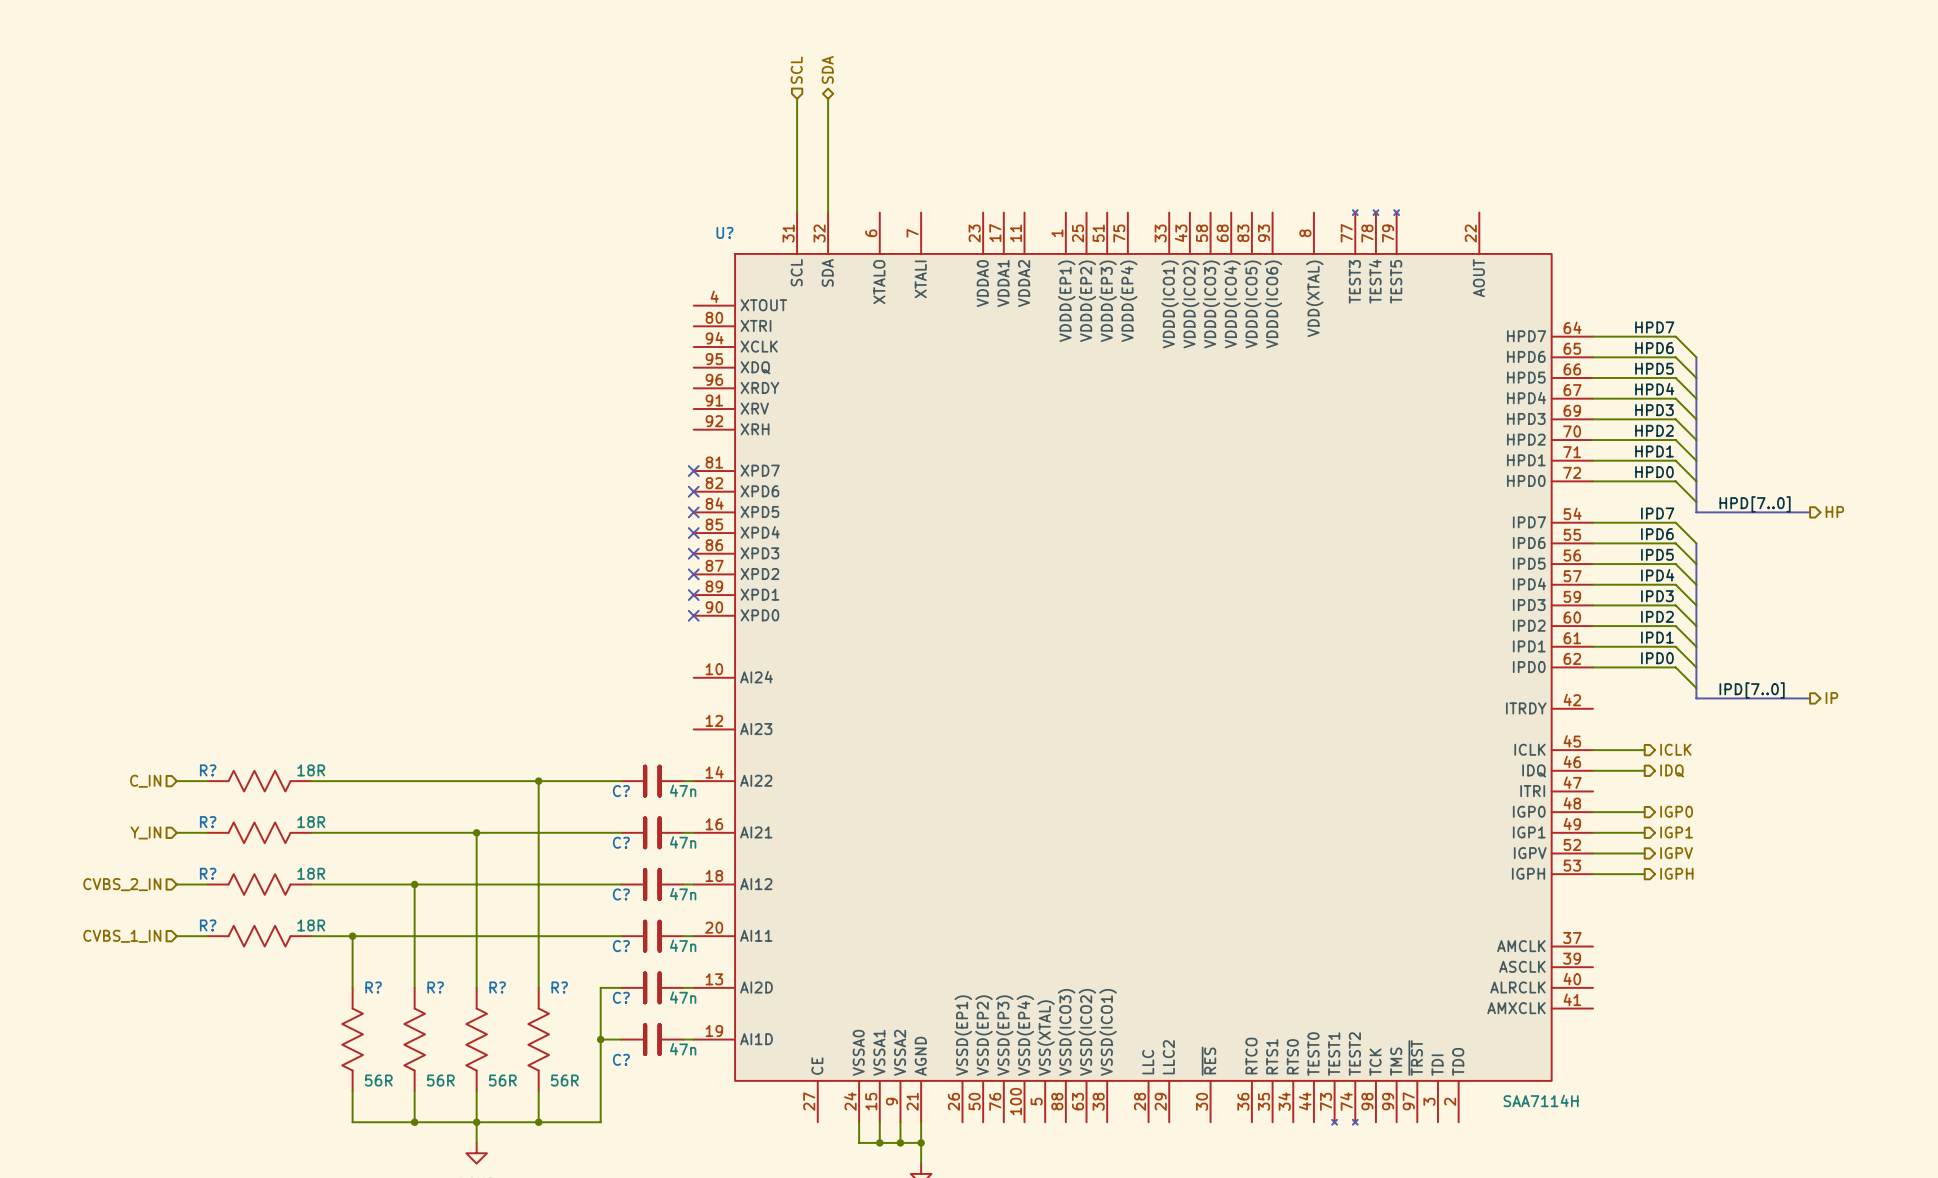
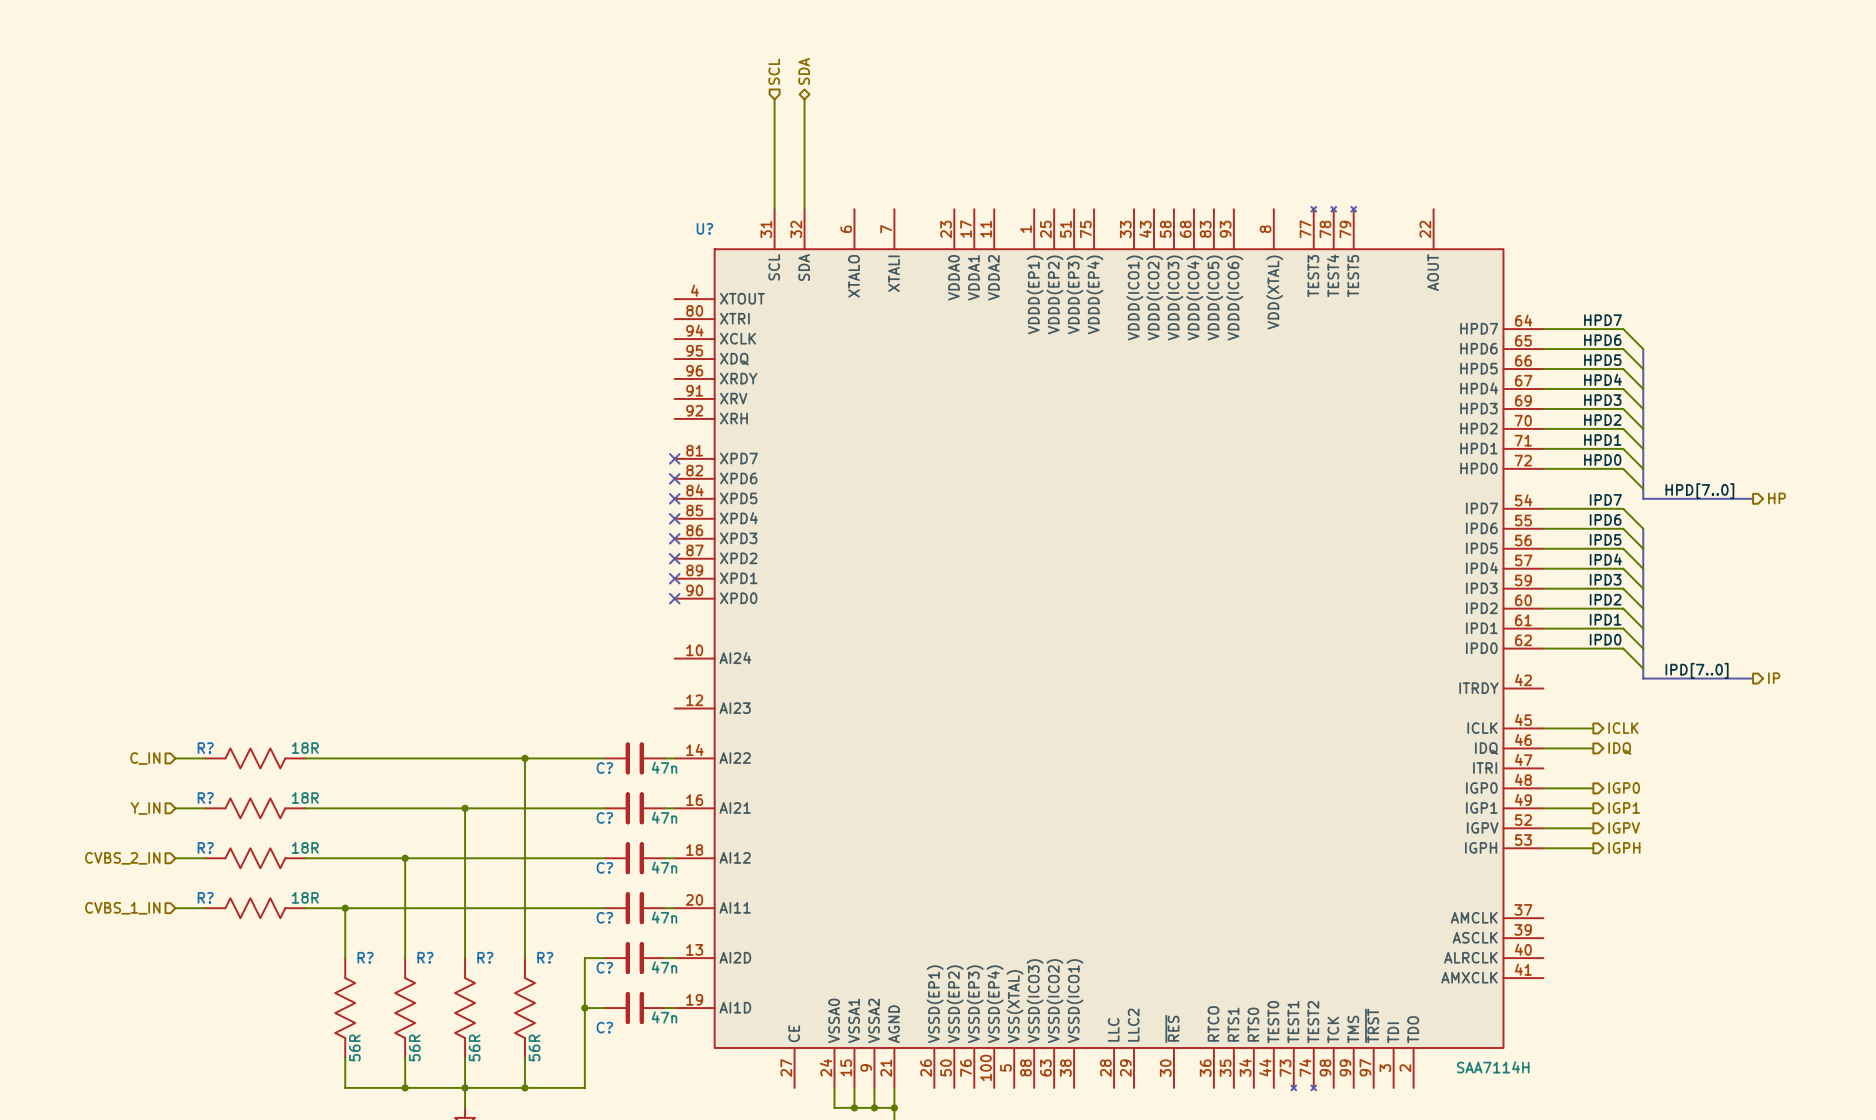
R? value rotation: 0° (378, 1080) -> 90° counterclockwise (354, 1047)
R? value rotation: 0° (440, 1080) -> 90° counterclockwise (414, 1047)
R? value rotation: 0° (502, 1080) -> 90° counterclockwise (474, 1047)
R? value rotation: 0° (564, 1080) -> 90° counterclockwise (534, 1047)

